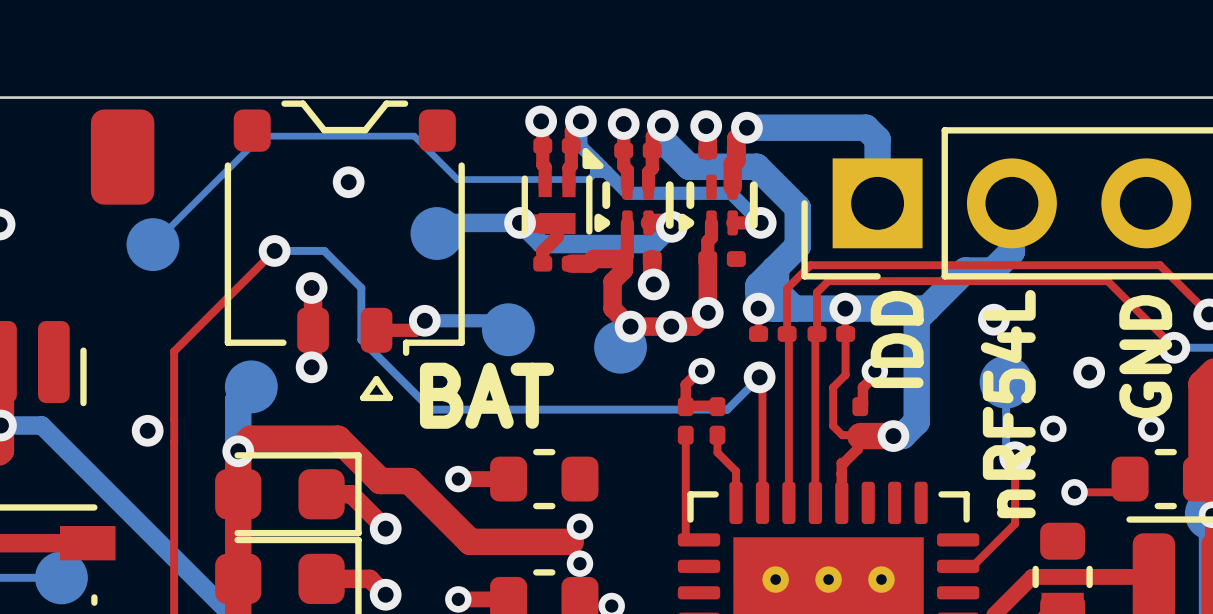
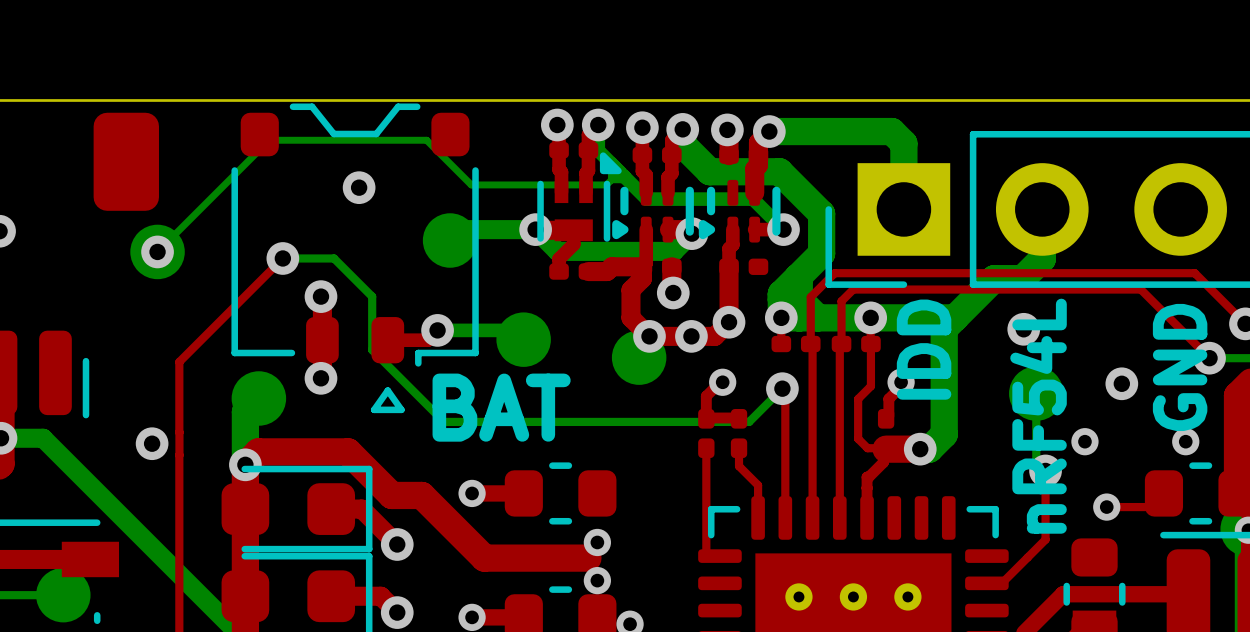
via: none -> (157, 251)

